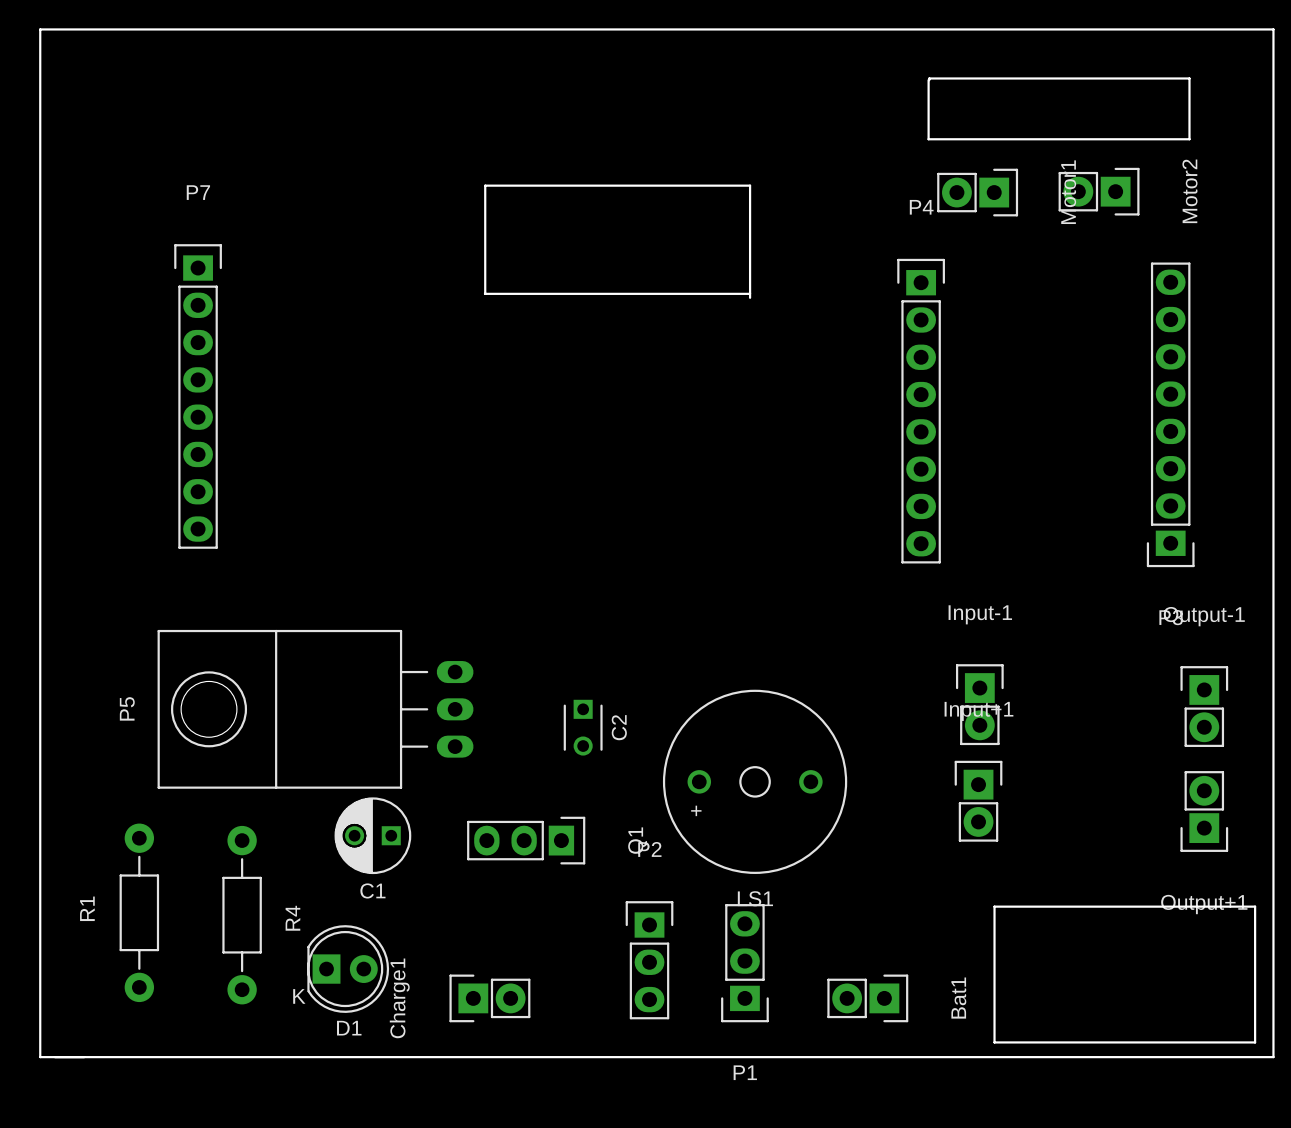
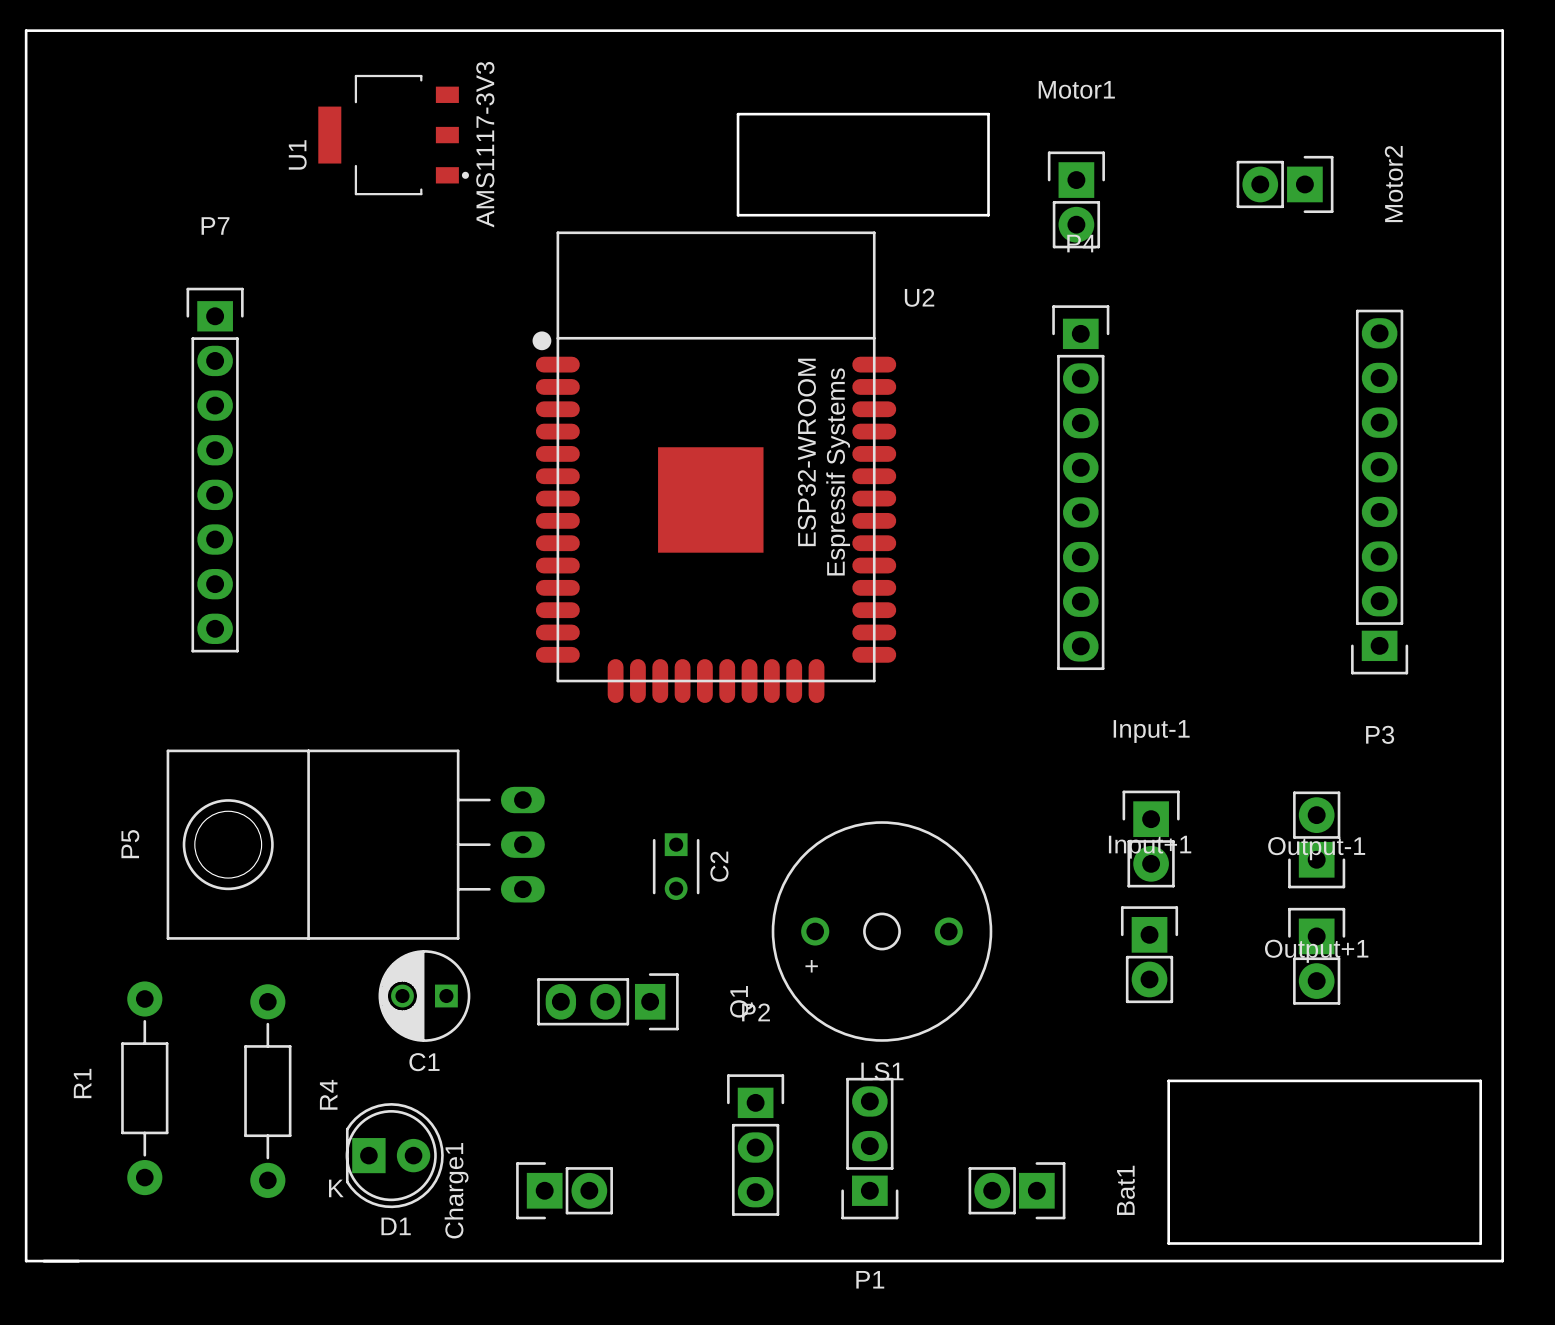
board edge: (928, 80) (928, 139) (1189, 139) (1189, 78) (929, 78) (929, 80) -> none
board edge: none -> (738, 114) (738, 215) (988, 215) (988, 114) (738, 114)
U1: none -> AMS1117-3V3 (393, 135)
Motor2 position: (1099, 191) -> (1285, 184)
Motor1 rotation: 0° (977, 192) -> 90° counterclockwise (1076, 199)
Motor1 position: (977, 192) -> (1076, 199)
board edge: (485, 293) (485, 185) (750, 185) (750, 297) -> none
board edge: (750, 293) (484, 293) -> none
U2: none -> (714, 467)
Output-1 position: (1204, 706) -> (1316, 956)
Output+1 position: (1204, 811) -> (1316, 839)

